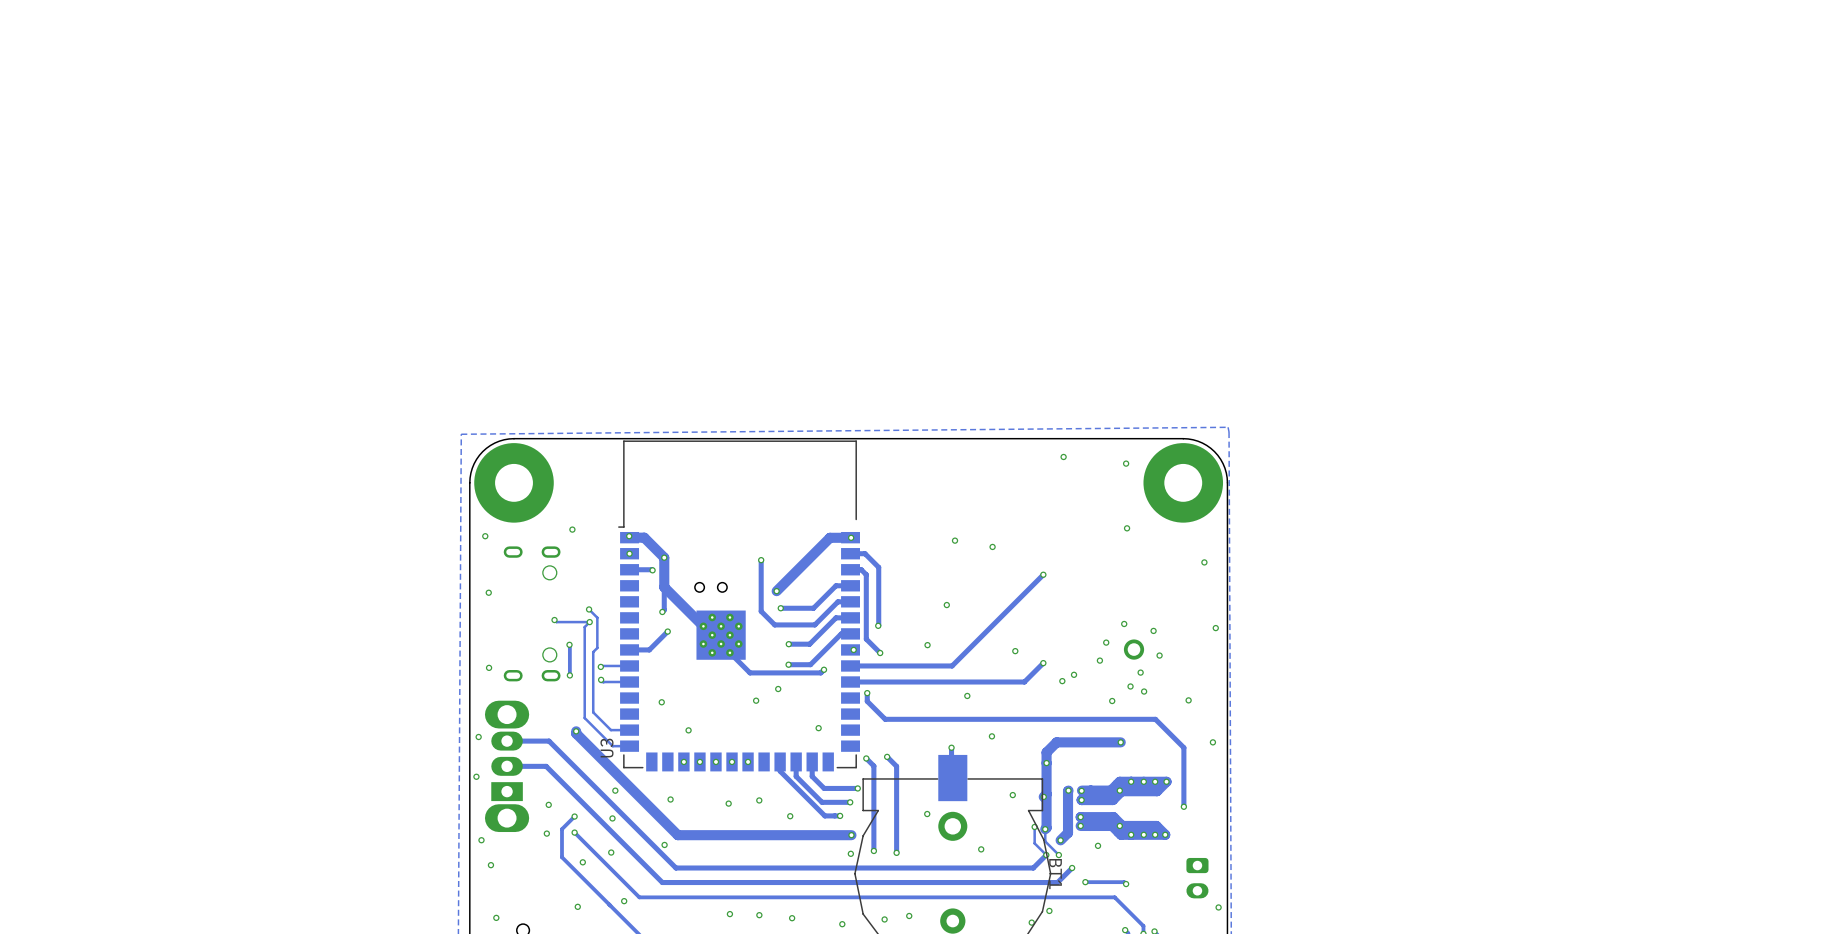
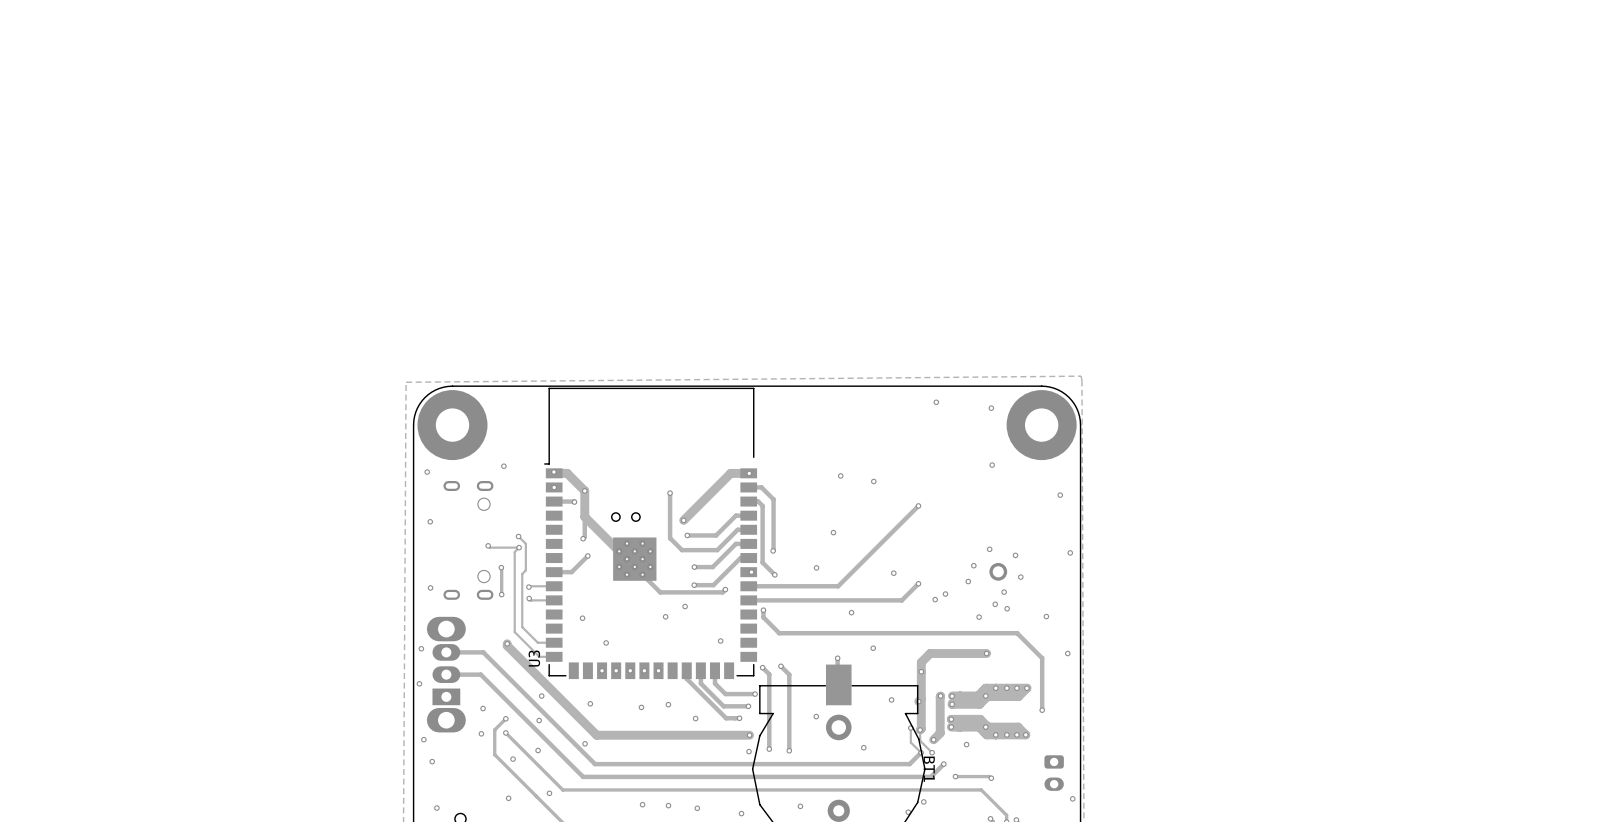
via: (884, 919) -> none

